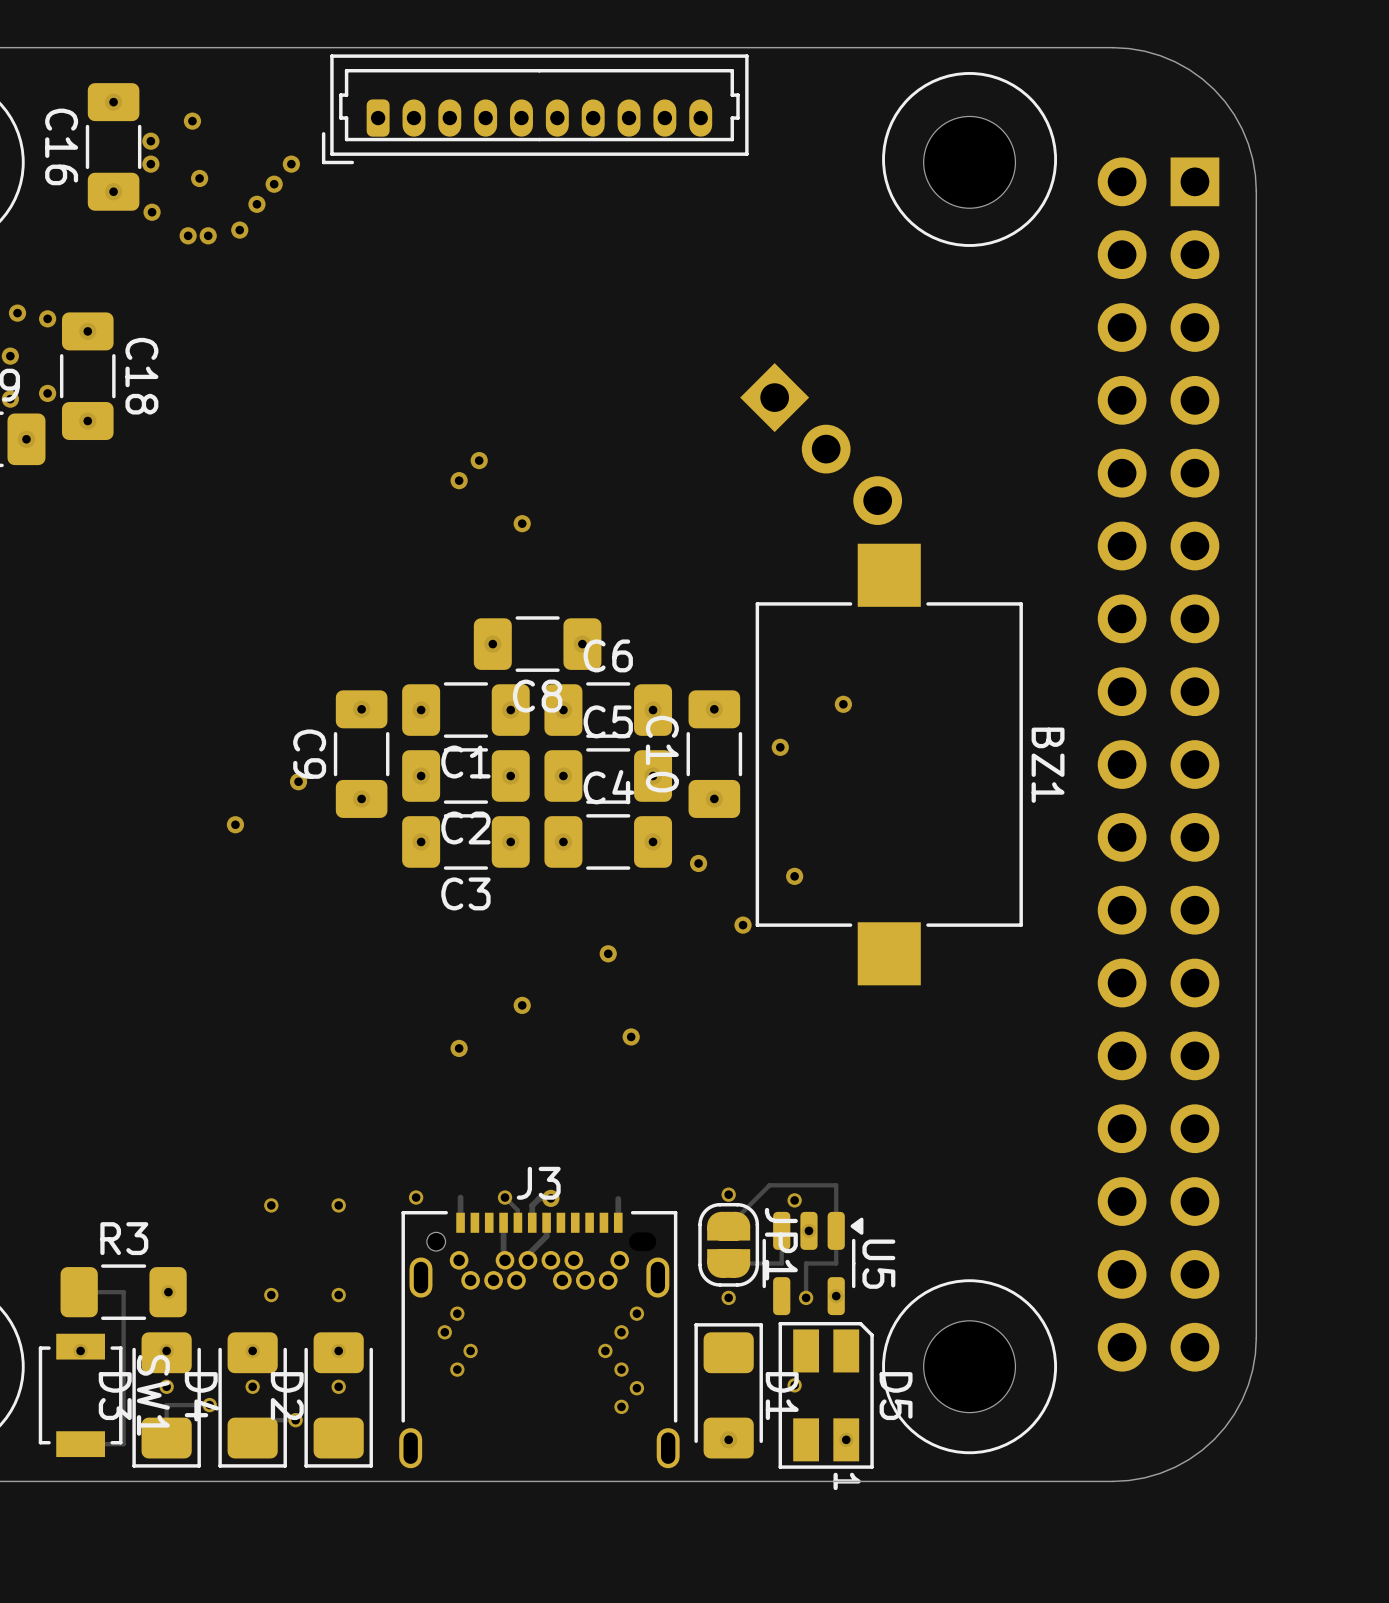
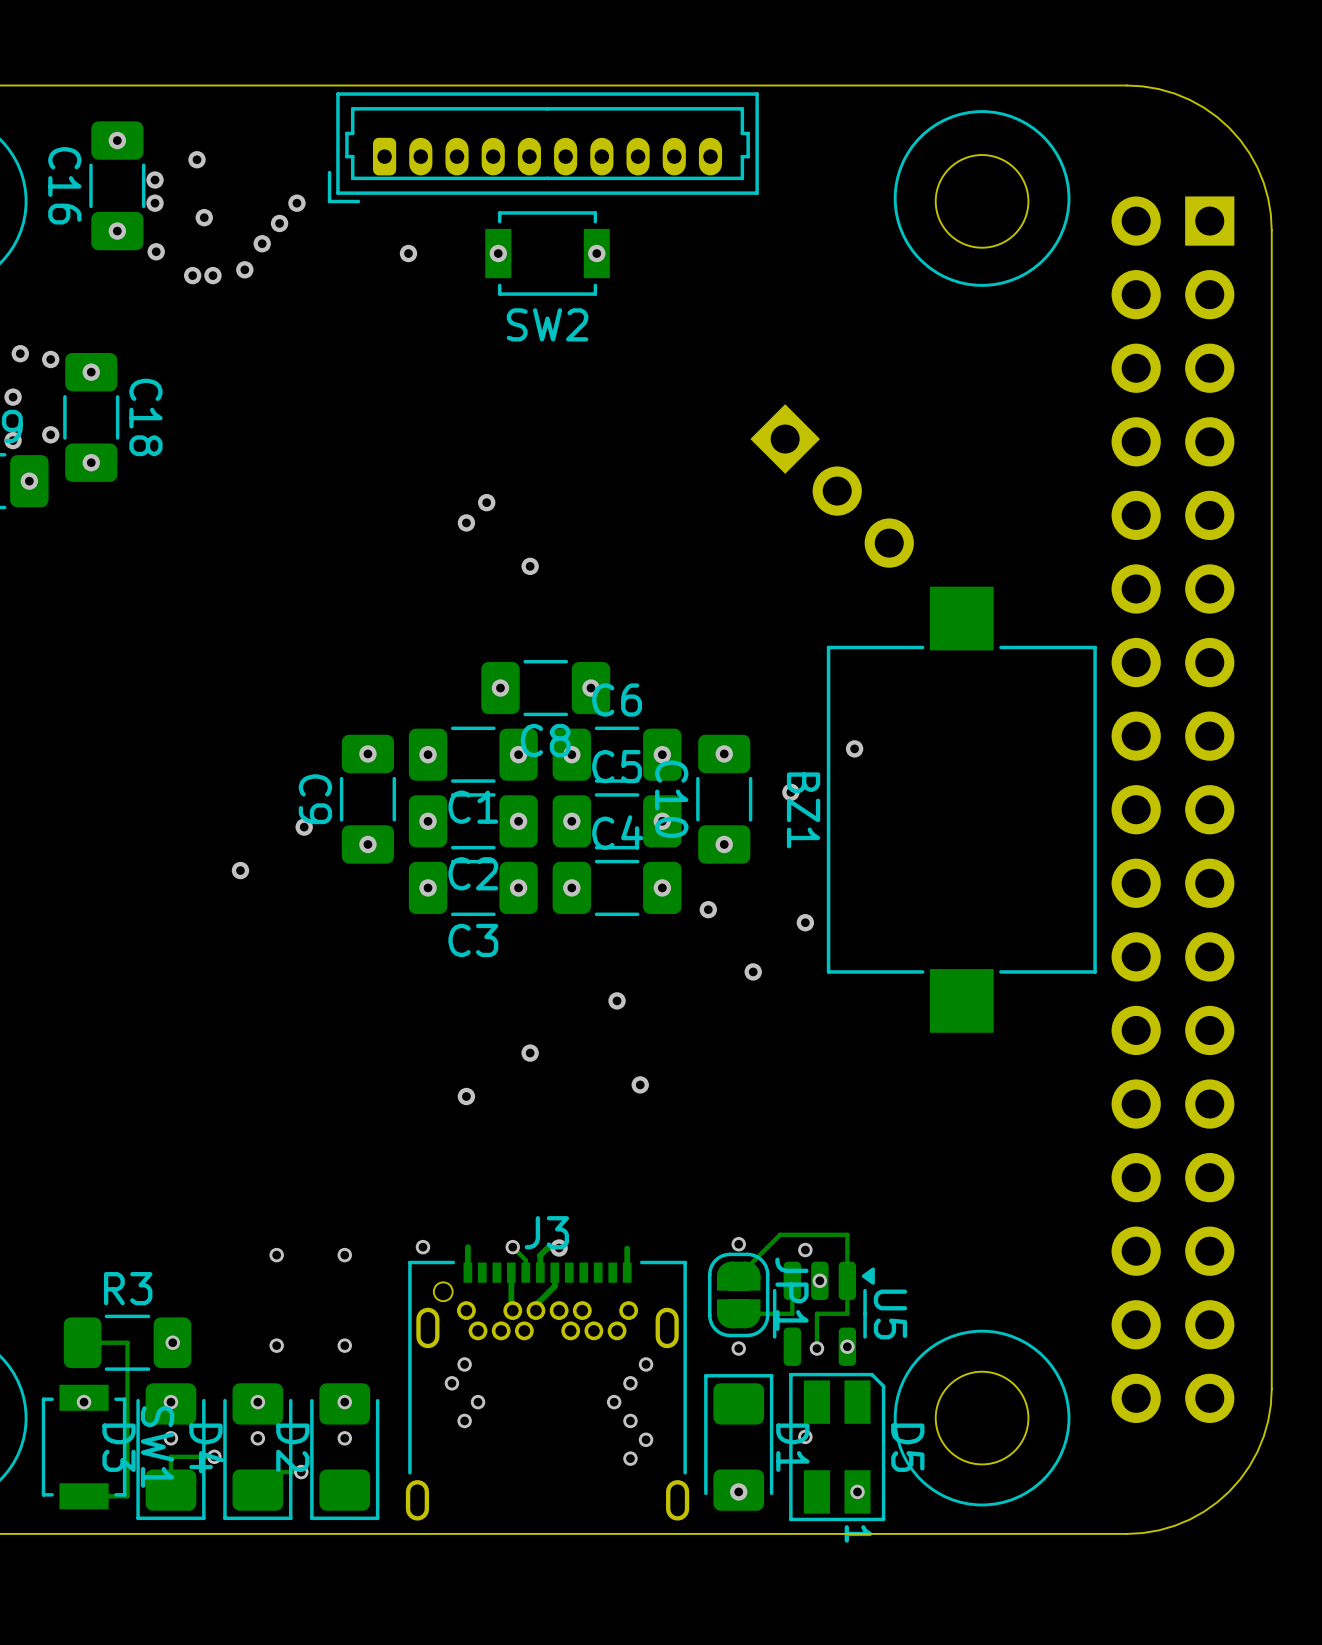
via: none -> (408, 253)
via: none -> (498, 253)
SW2: none -> (547, 253)
via: none -> (596, 253)
BZ1 position: (889, 764) -> (961, 809)
BZ1 name position: BZ1 (1048, 765) -> BZ1 (803, 810)

